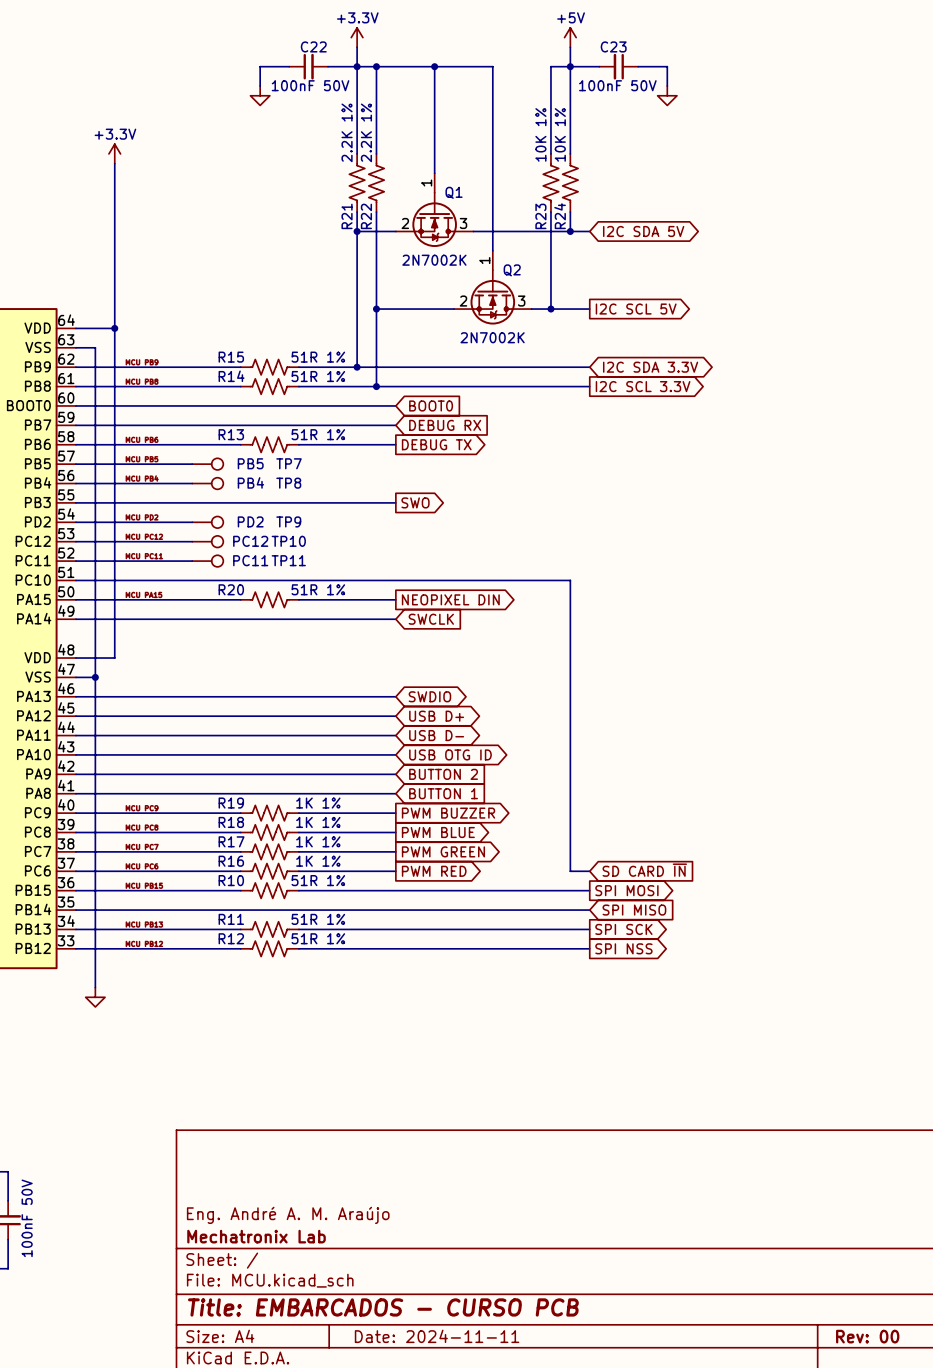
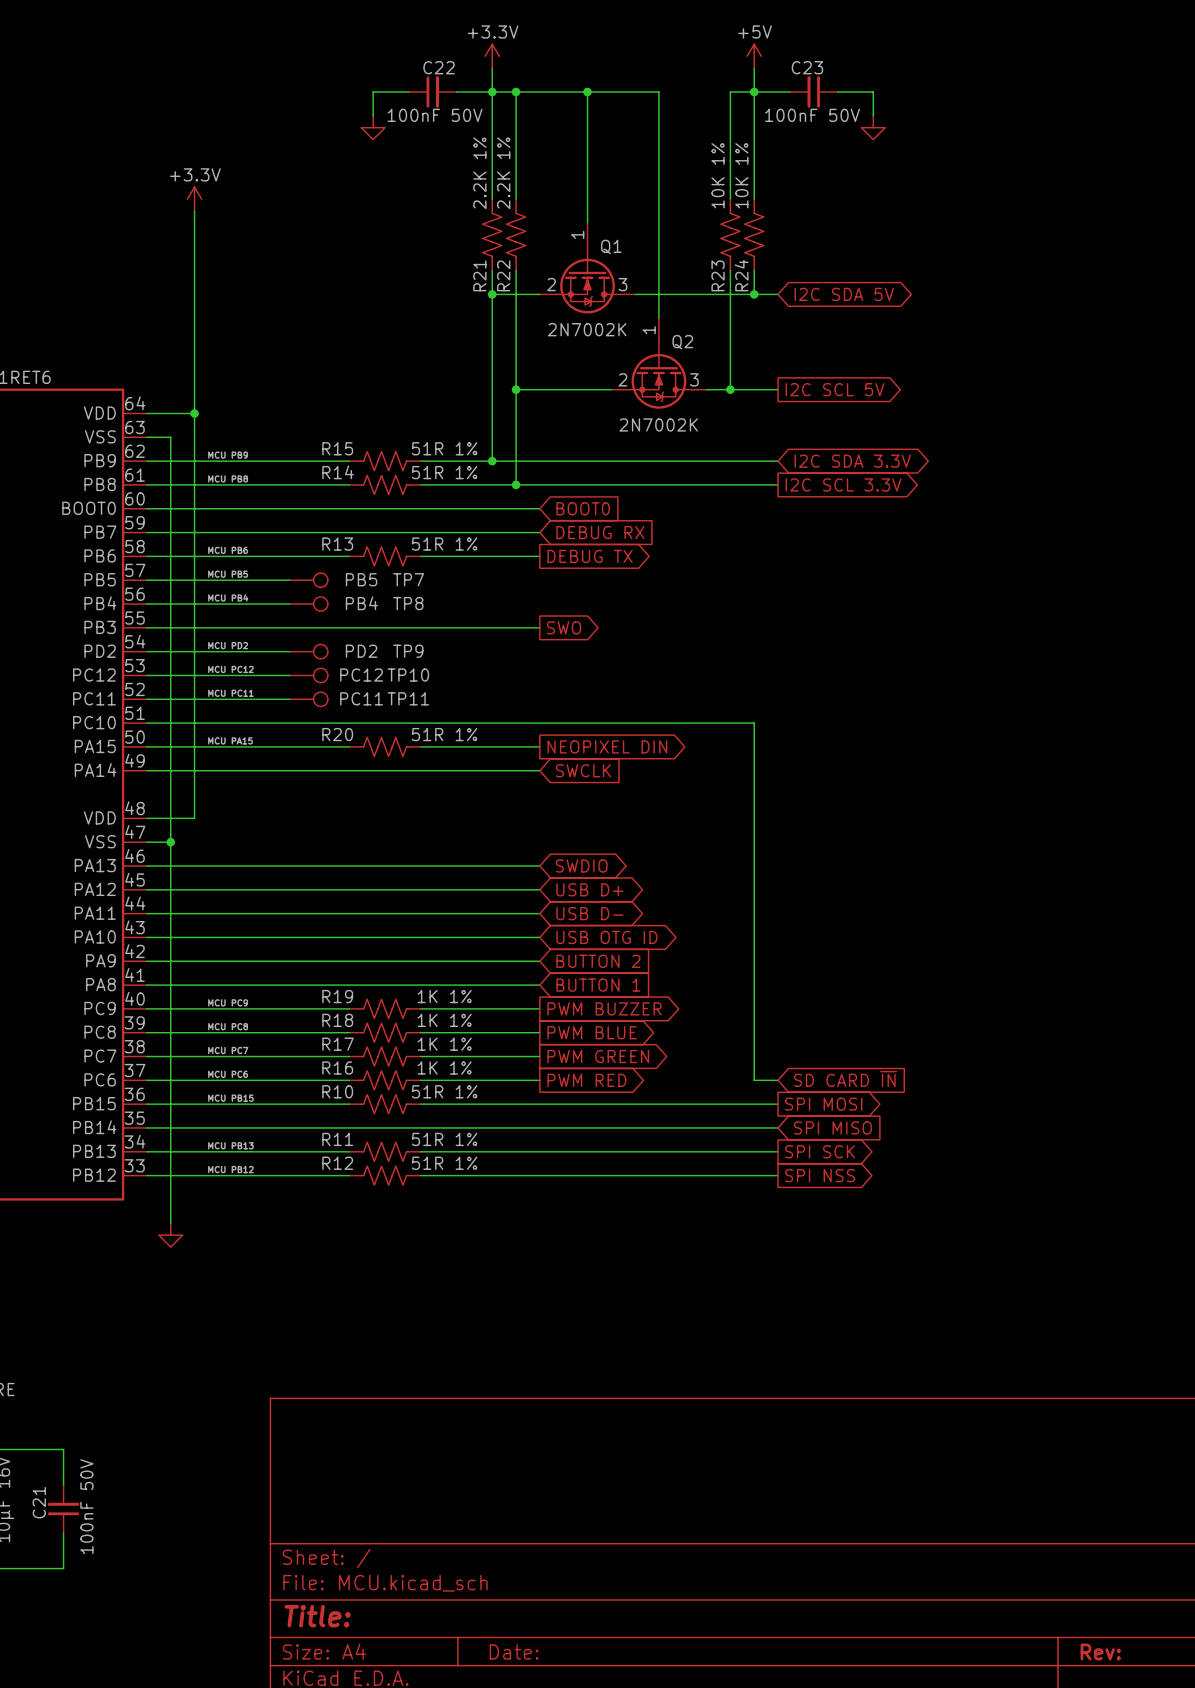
title block: Eng. André A. M. Araújo (288, 1215) -> none
title block: Mechatronix Lab (256, 1236) -> none
title block: Title: EMBARCADOS - CURSO PCB (383, 1307) -> Title: (317, 1616)
title block: Date: 2024-11-11 (437, 1336) -> Date: (514, 1651)
title block: Rev: 00 (867, 1336) -> Rev: (1100, 1651)

